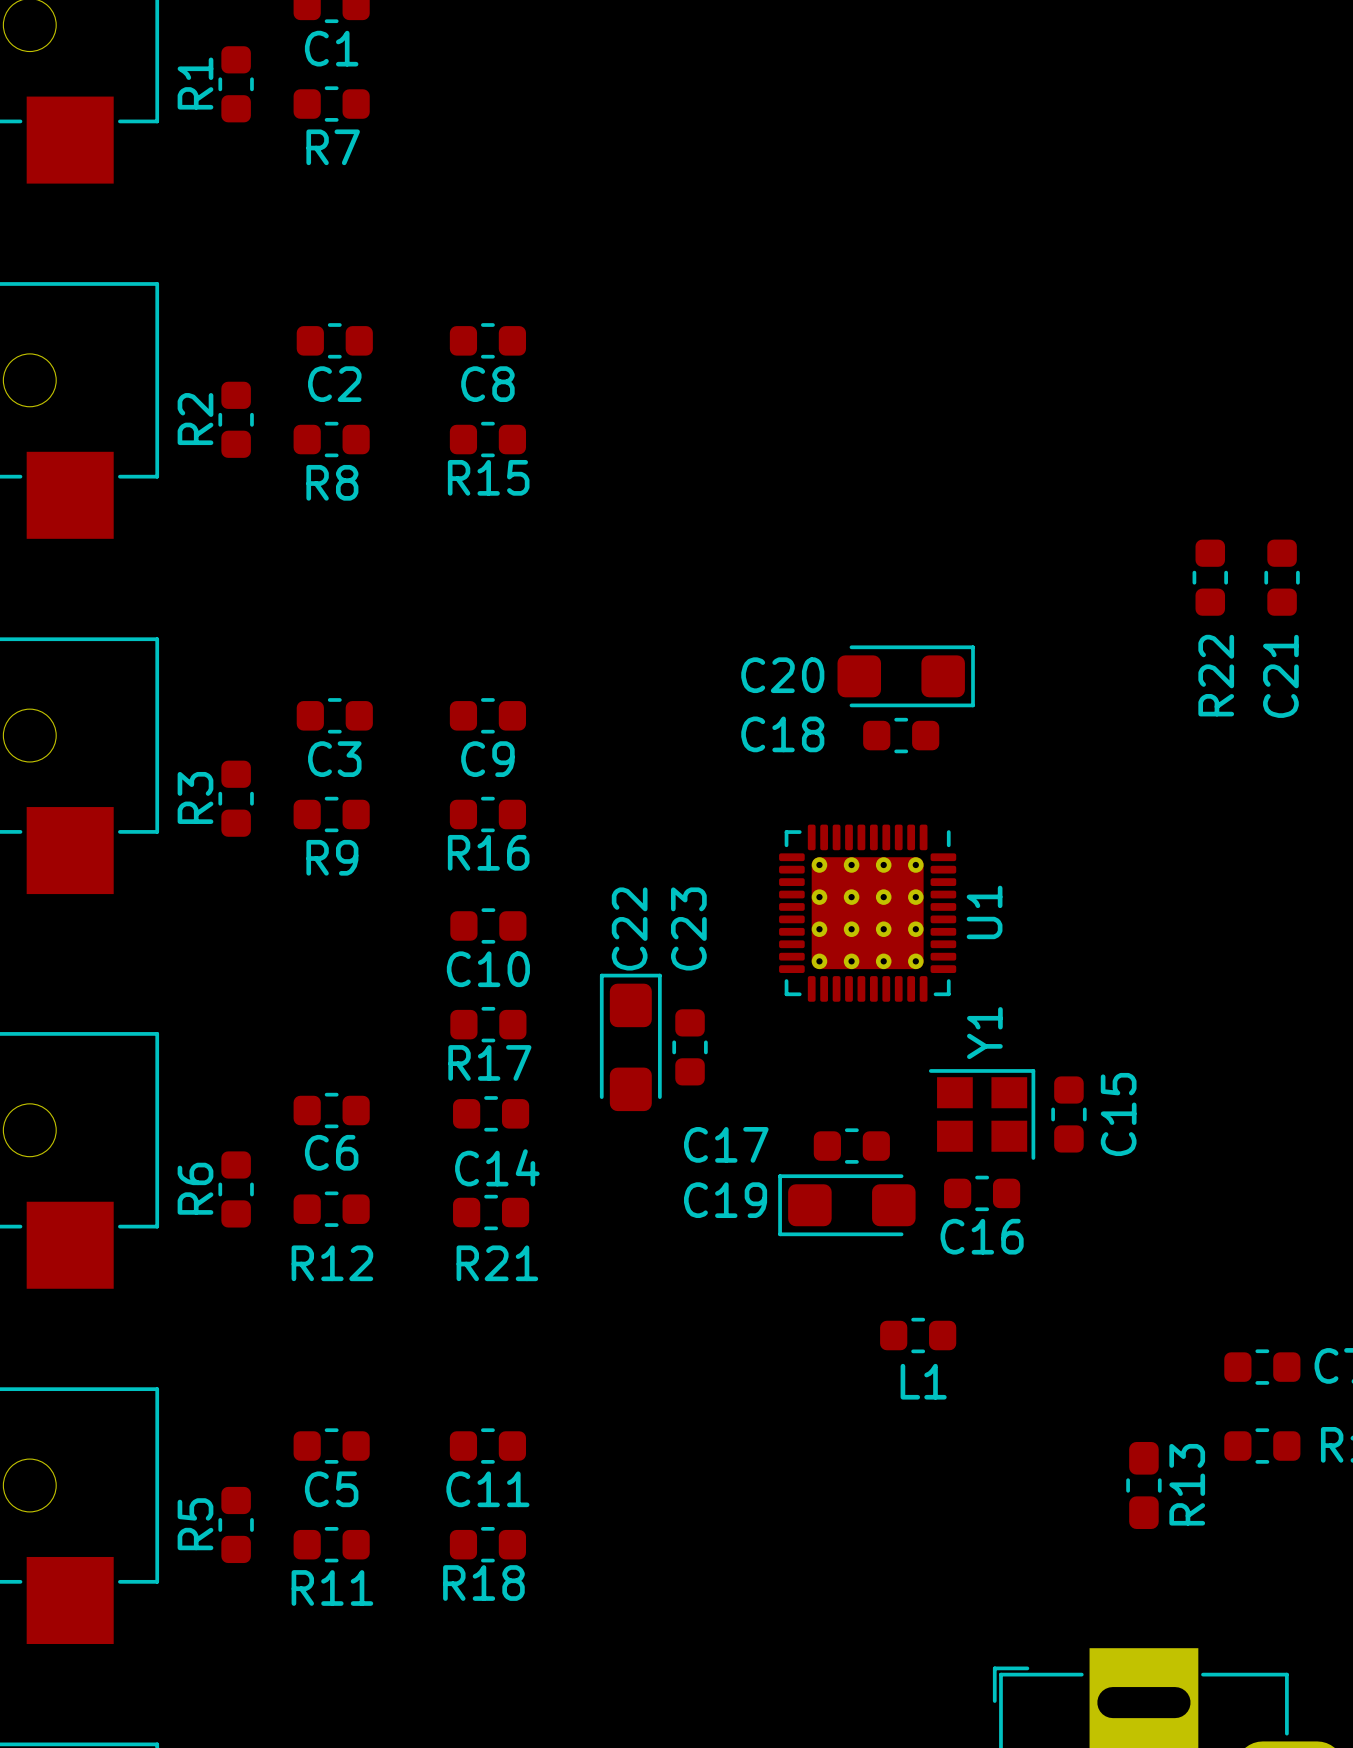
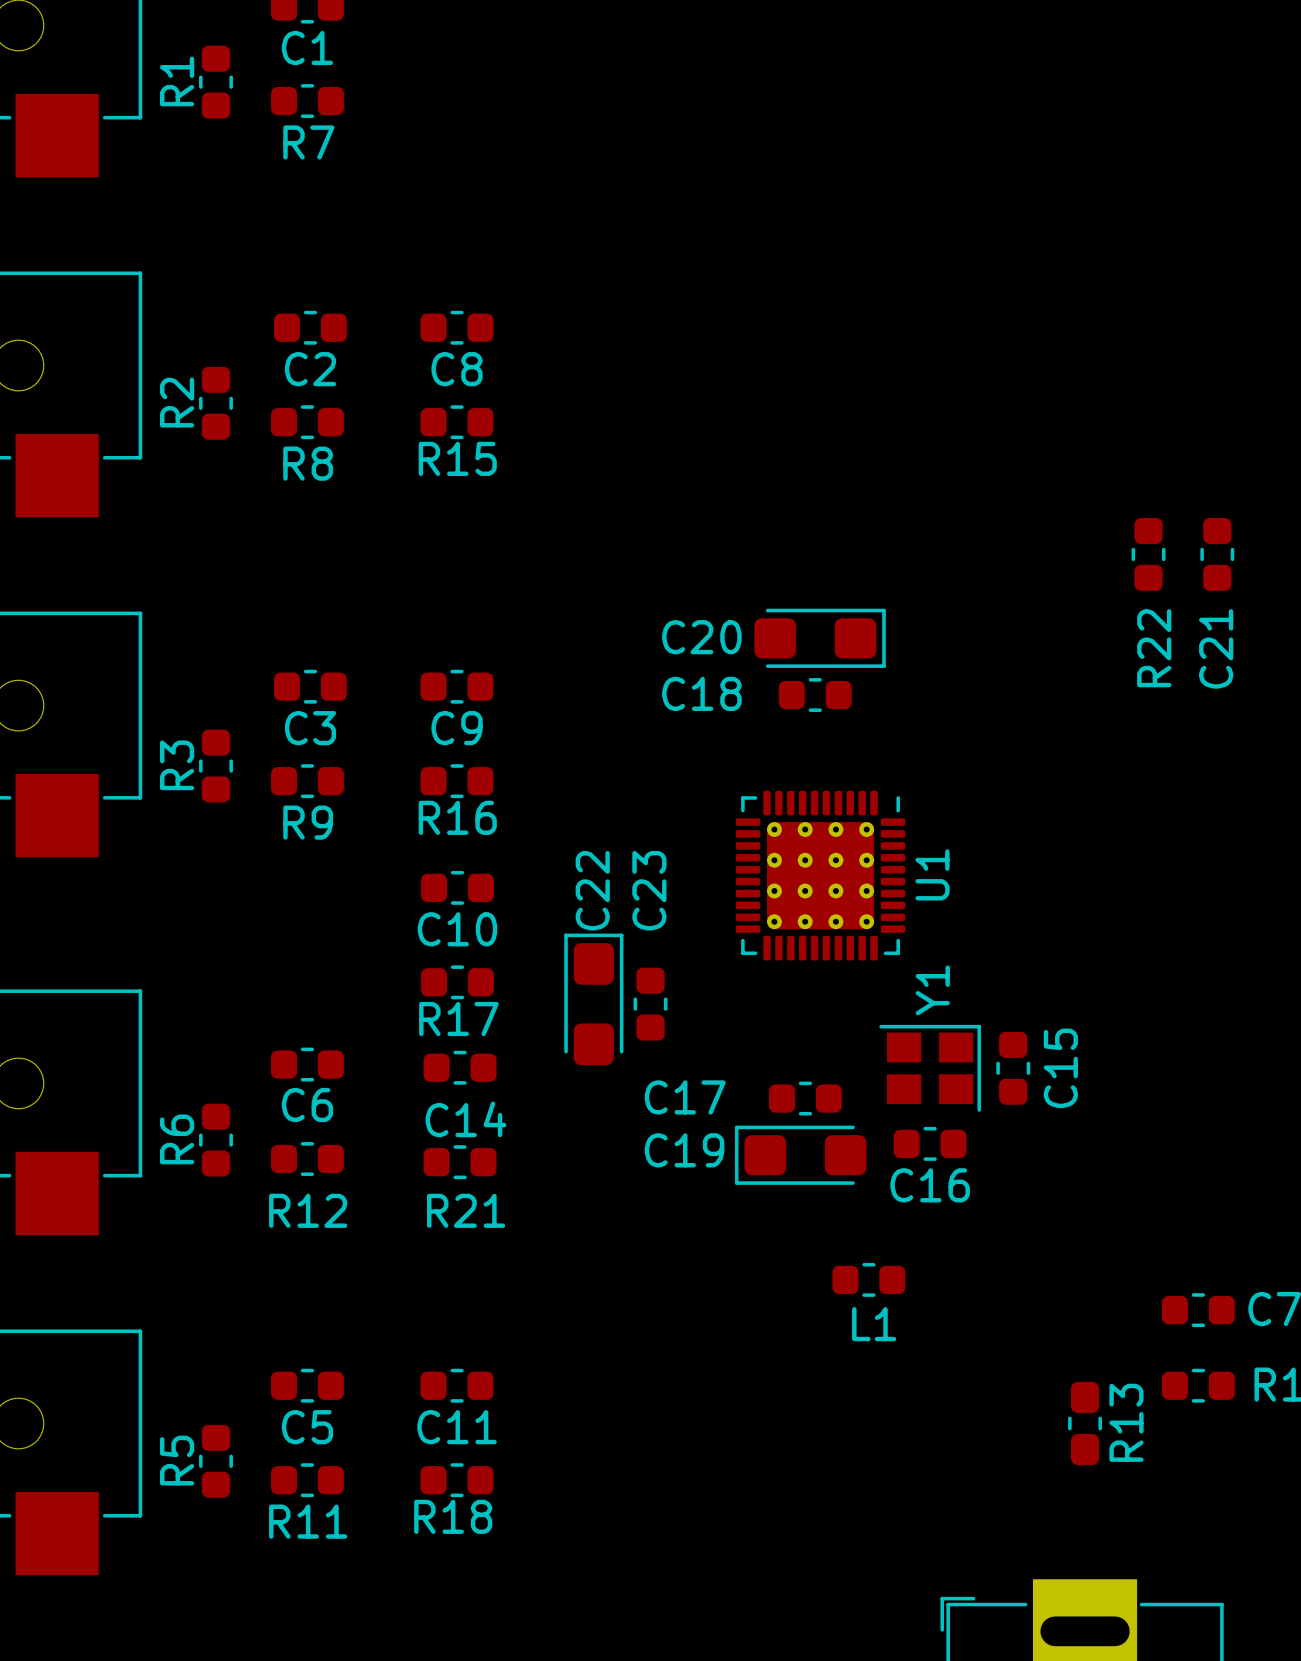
C20 position: (906, 676) -> (820, 638)
C18 position: (901, 735) -> (815, 695)

